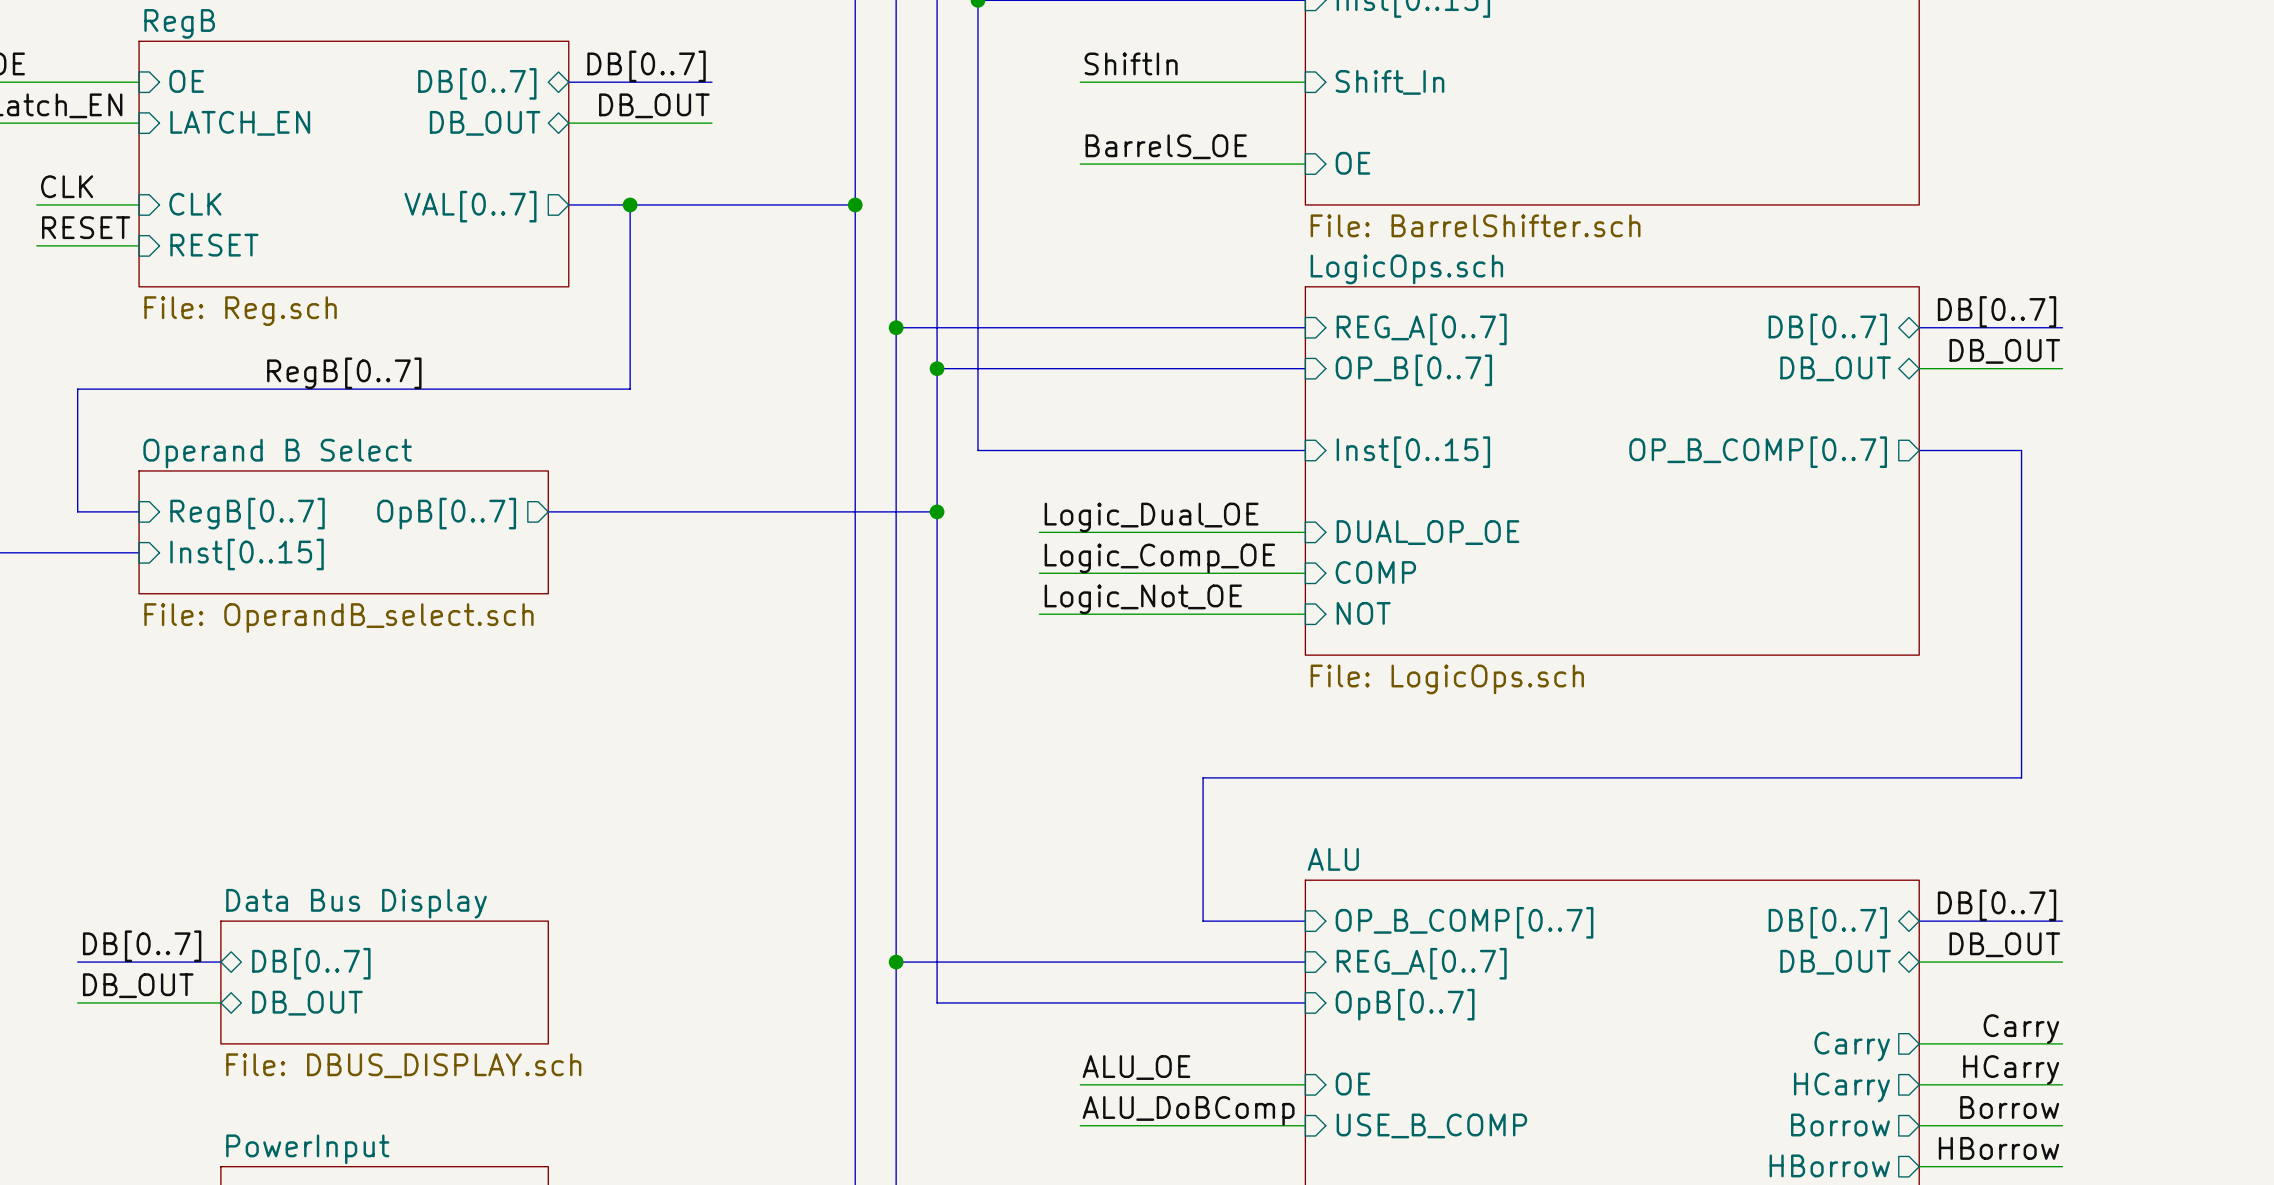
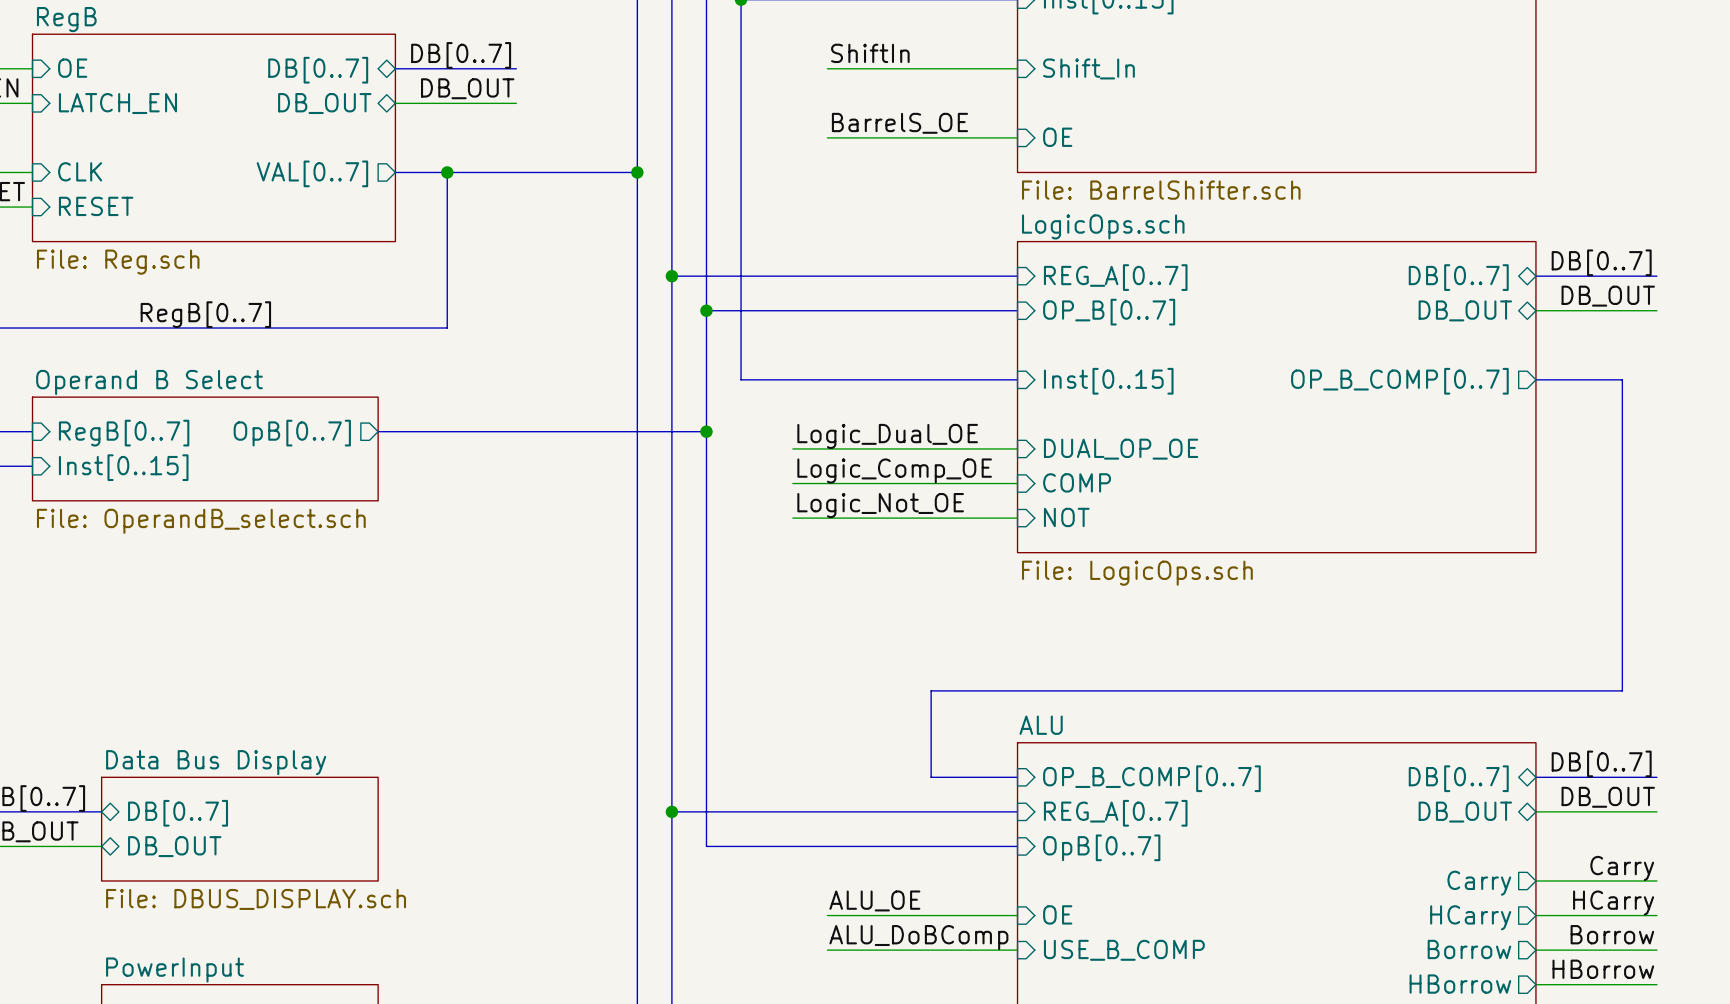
bus: (2021, 777) (1203, 777) (1203, 818) -> (1622, 656) (1622, 690) (931, 690)

